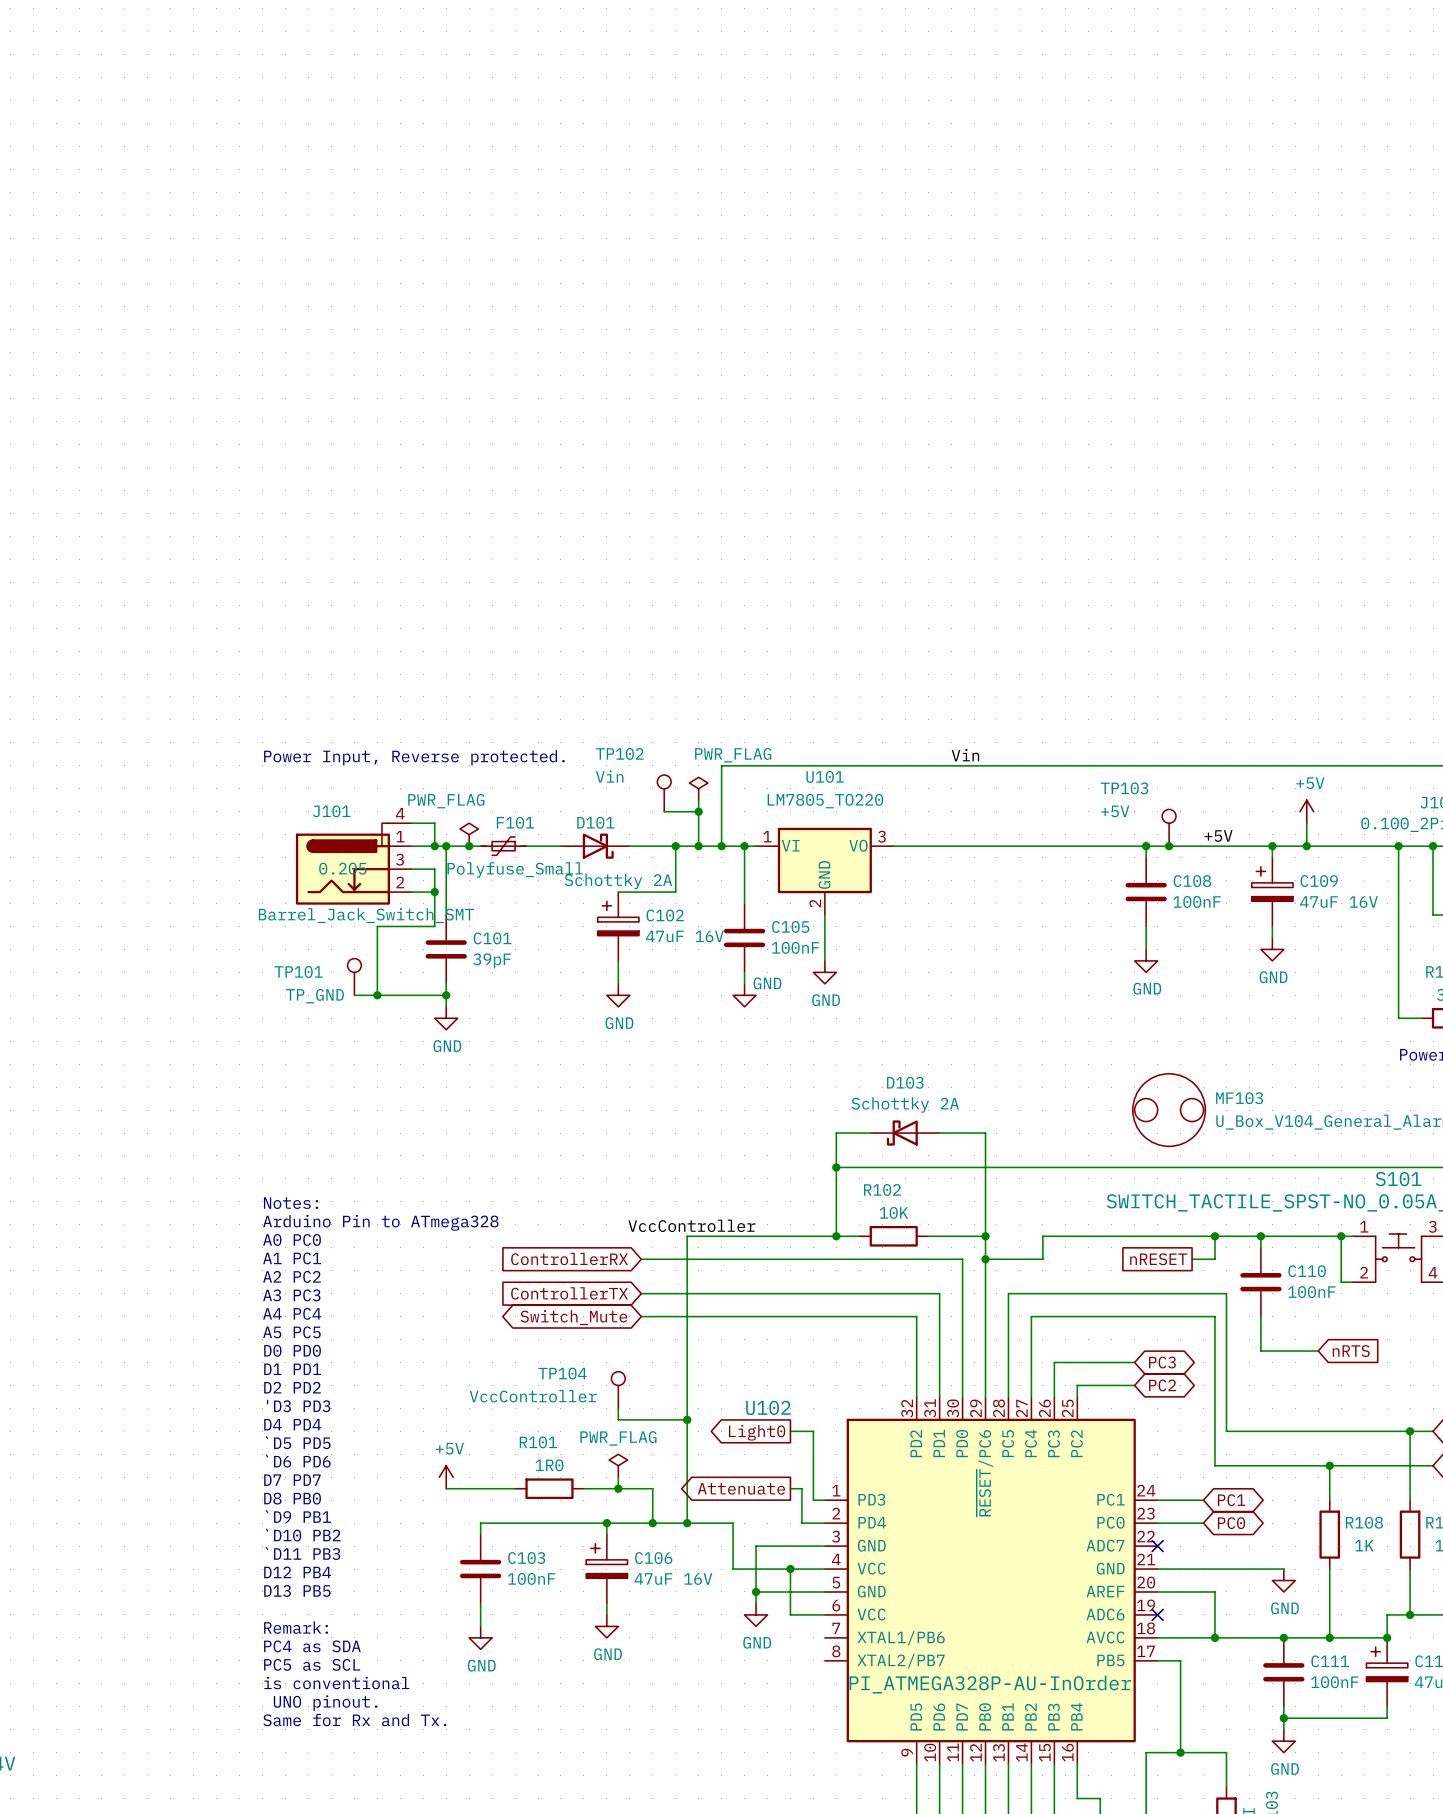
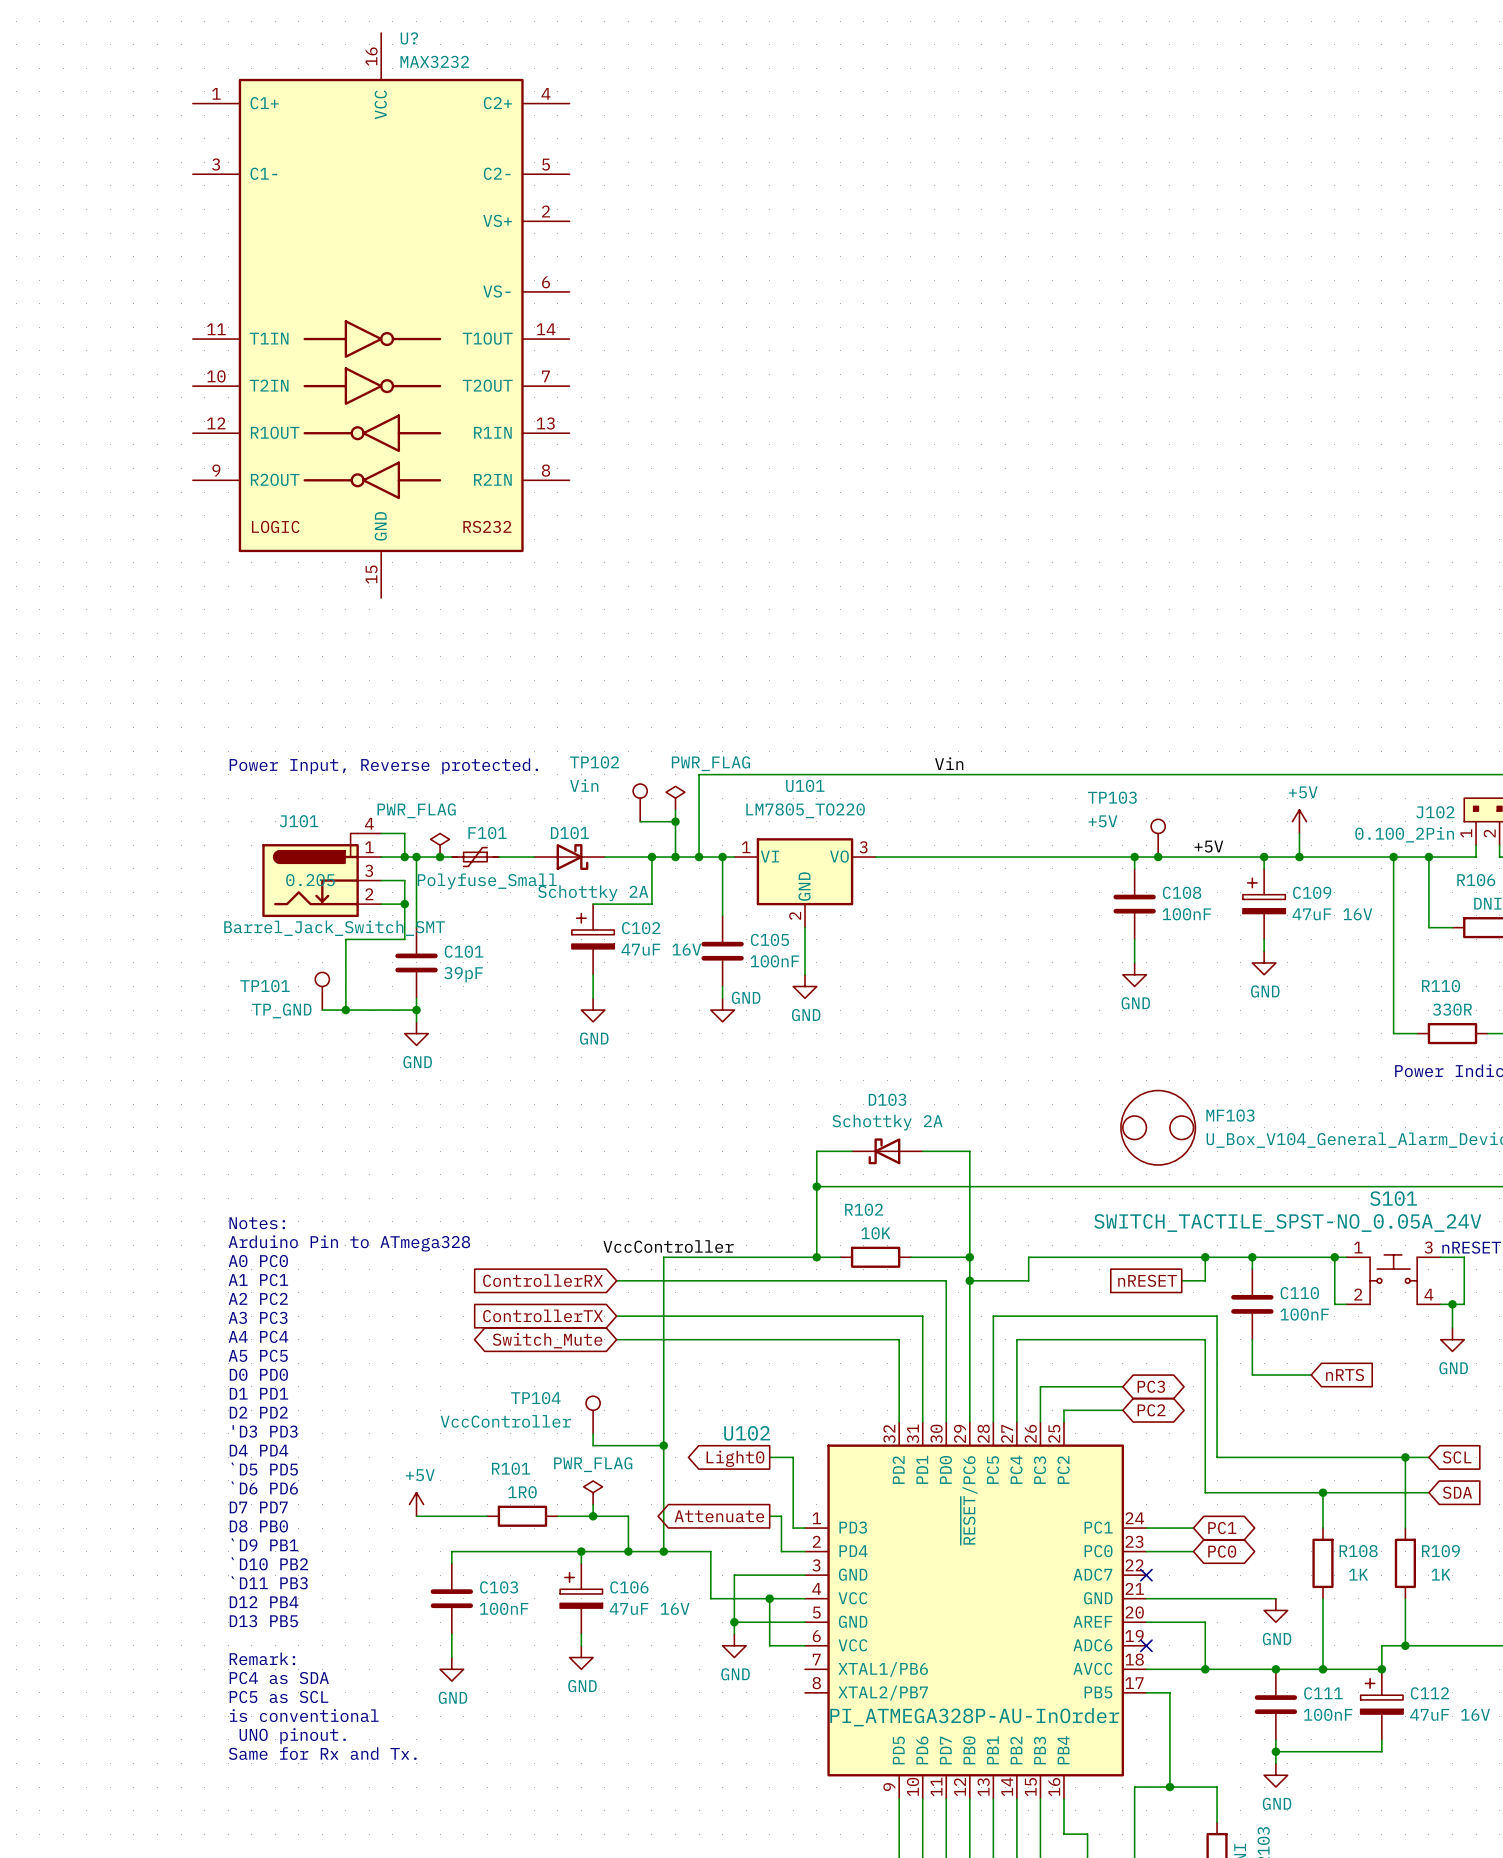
U?: none -> MAX3232 (381, 315)

